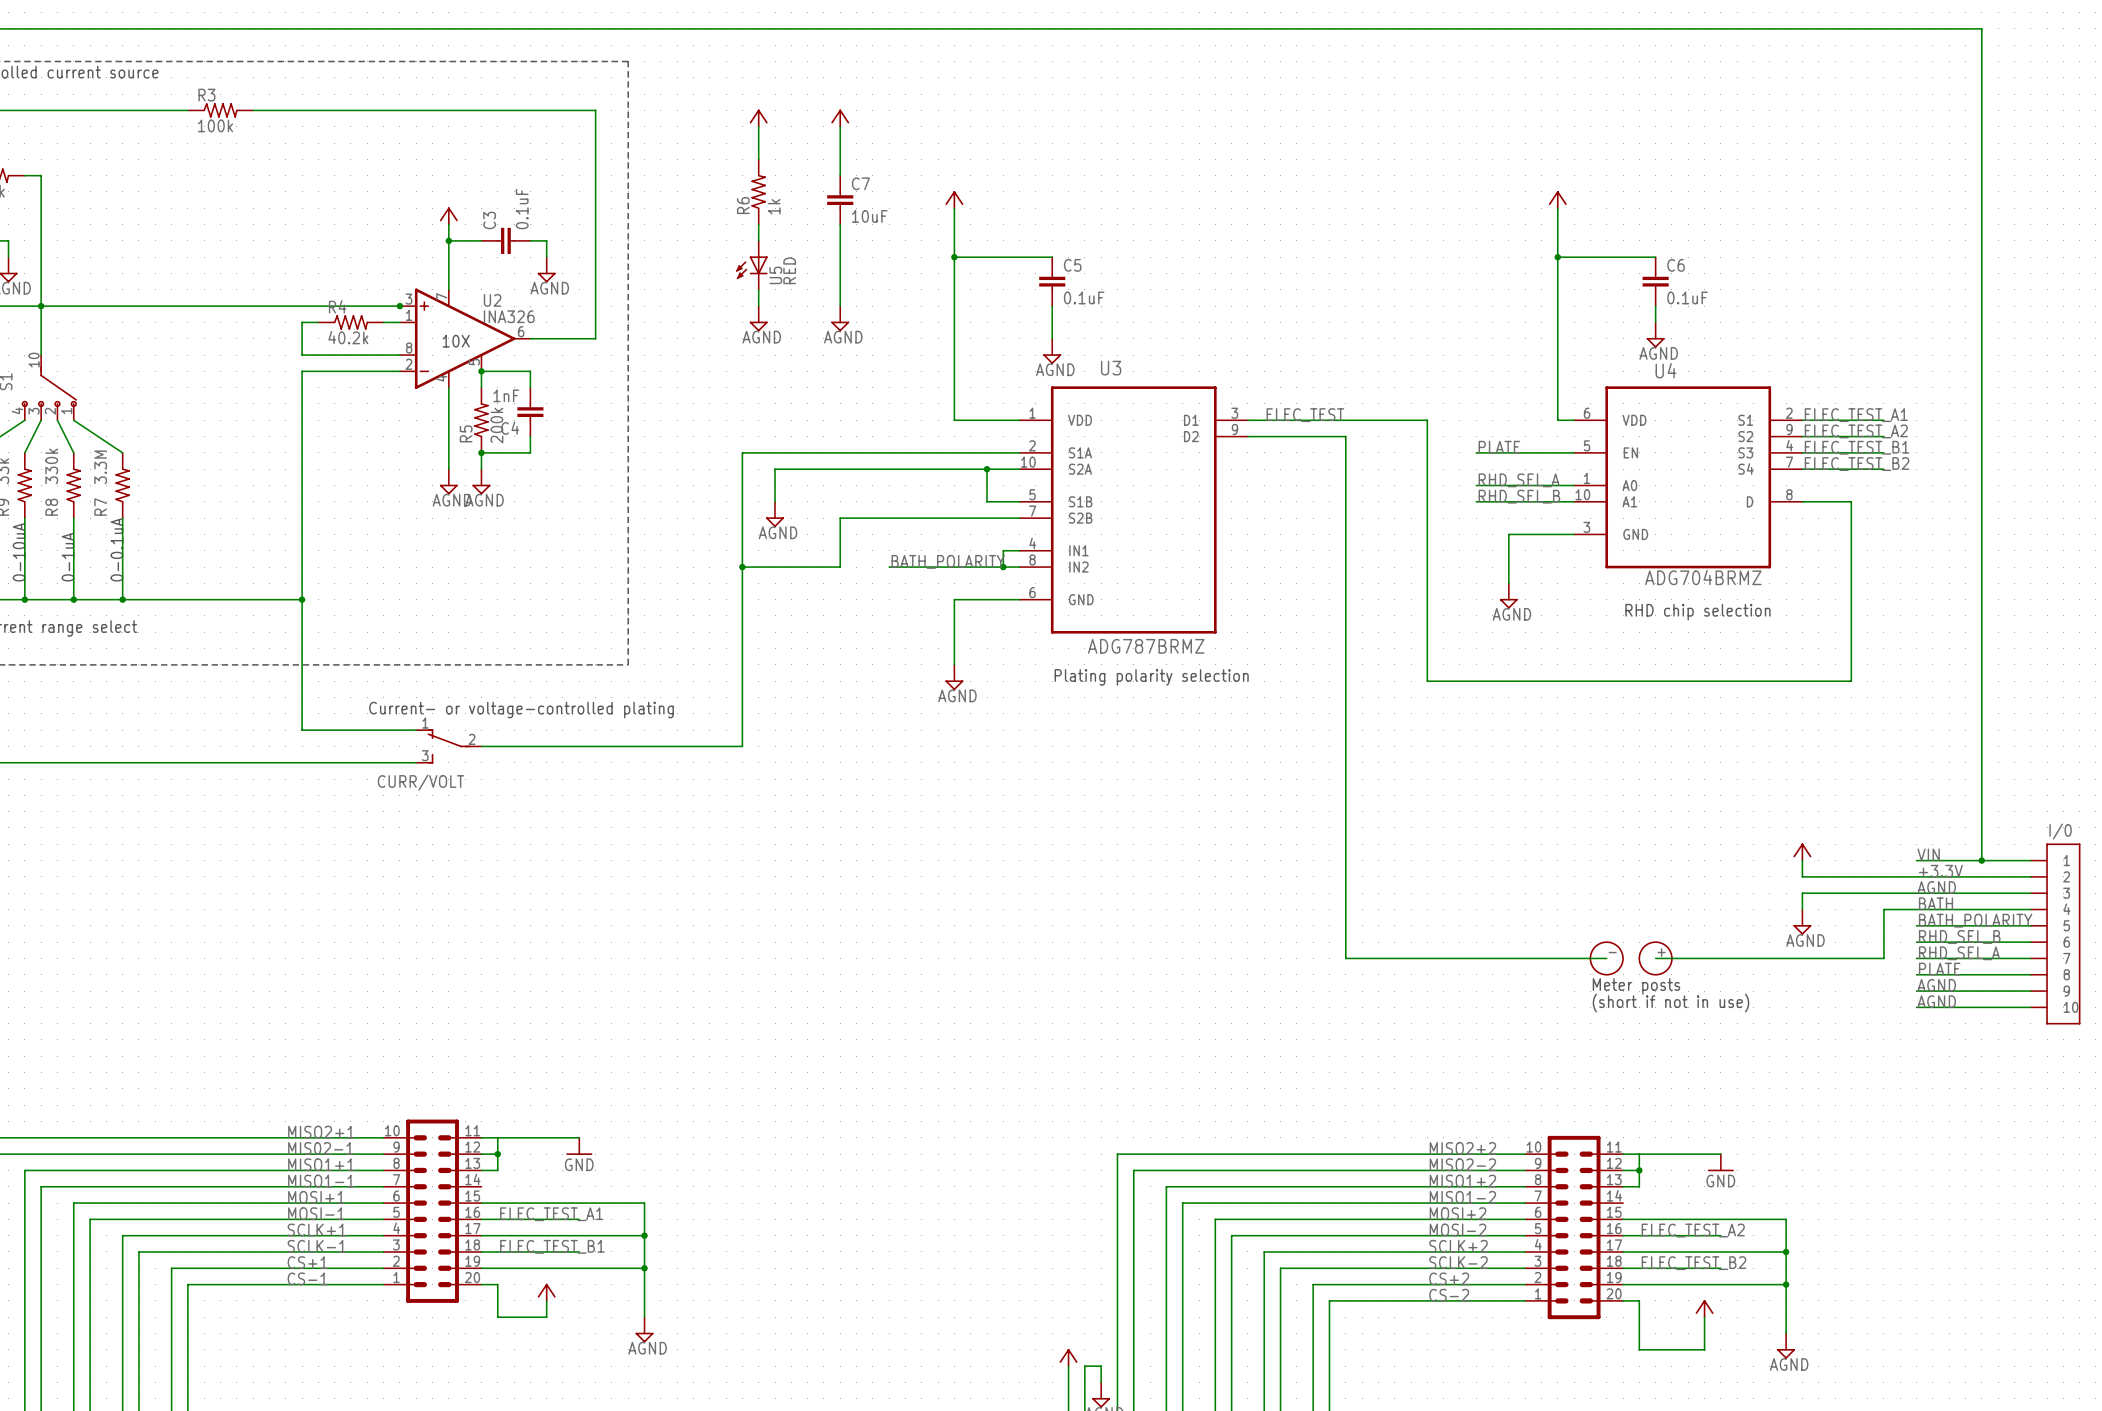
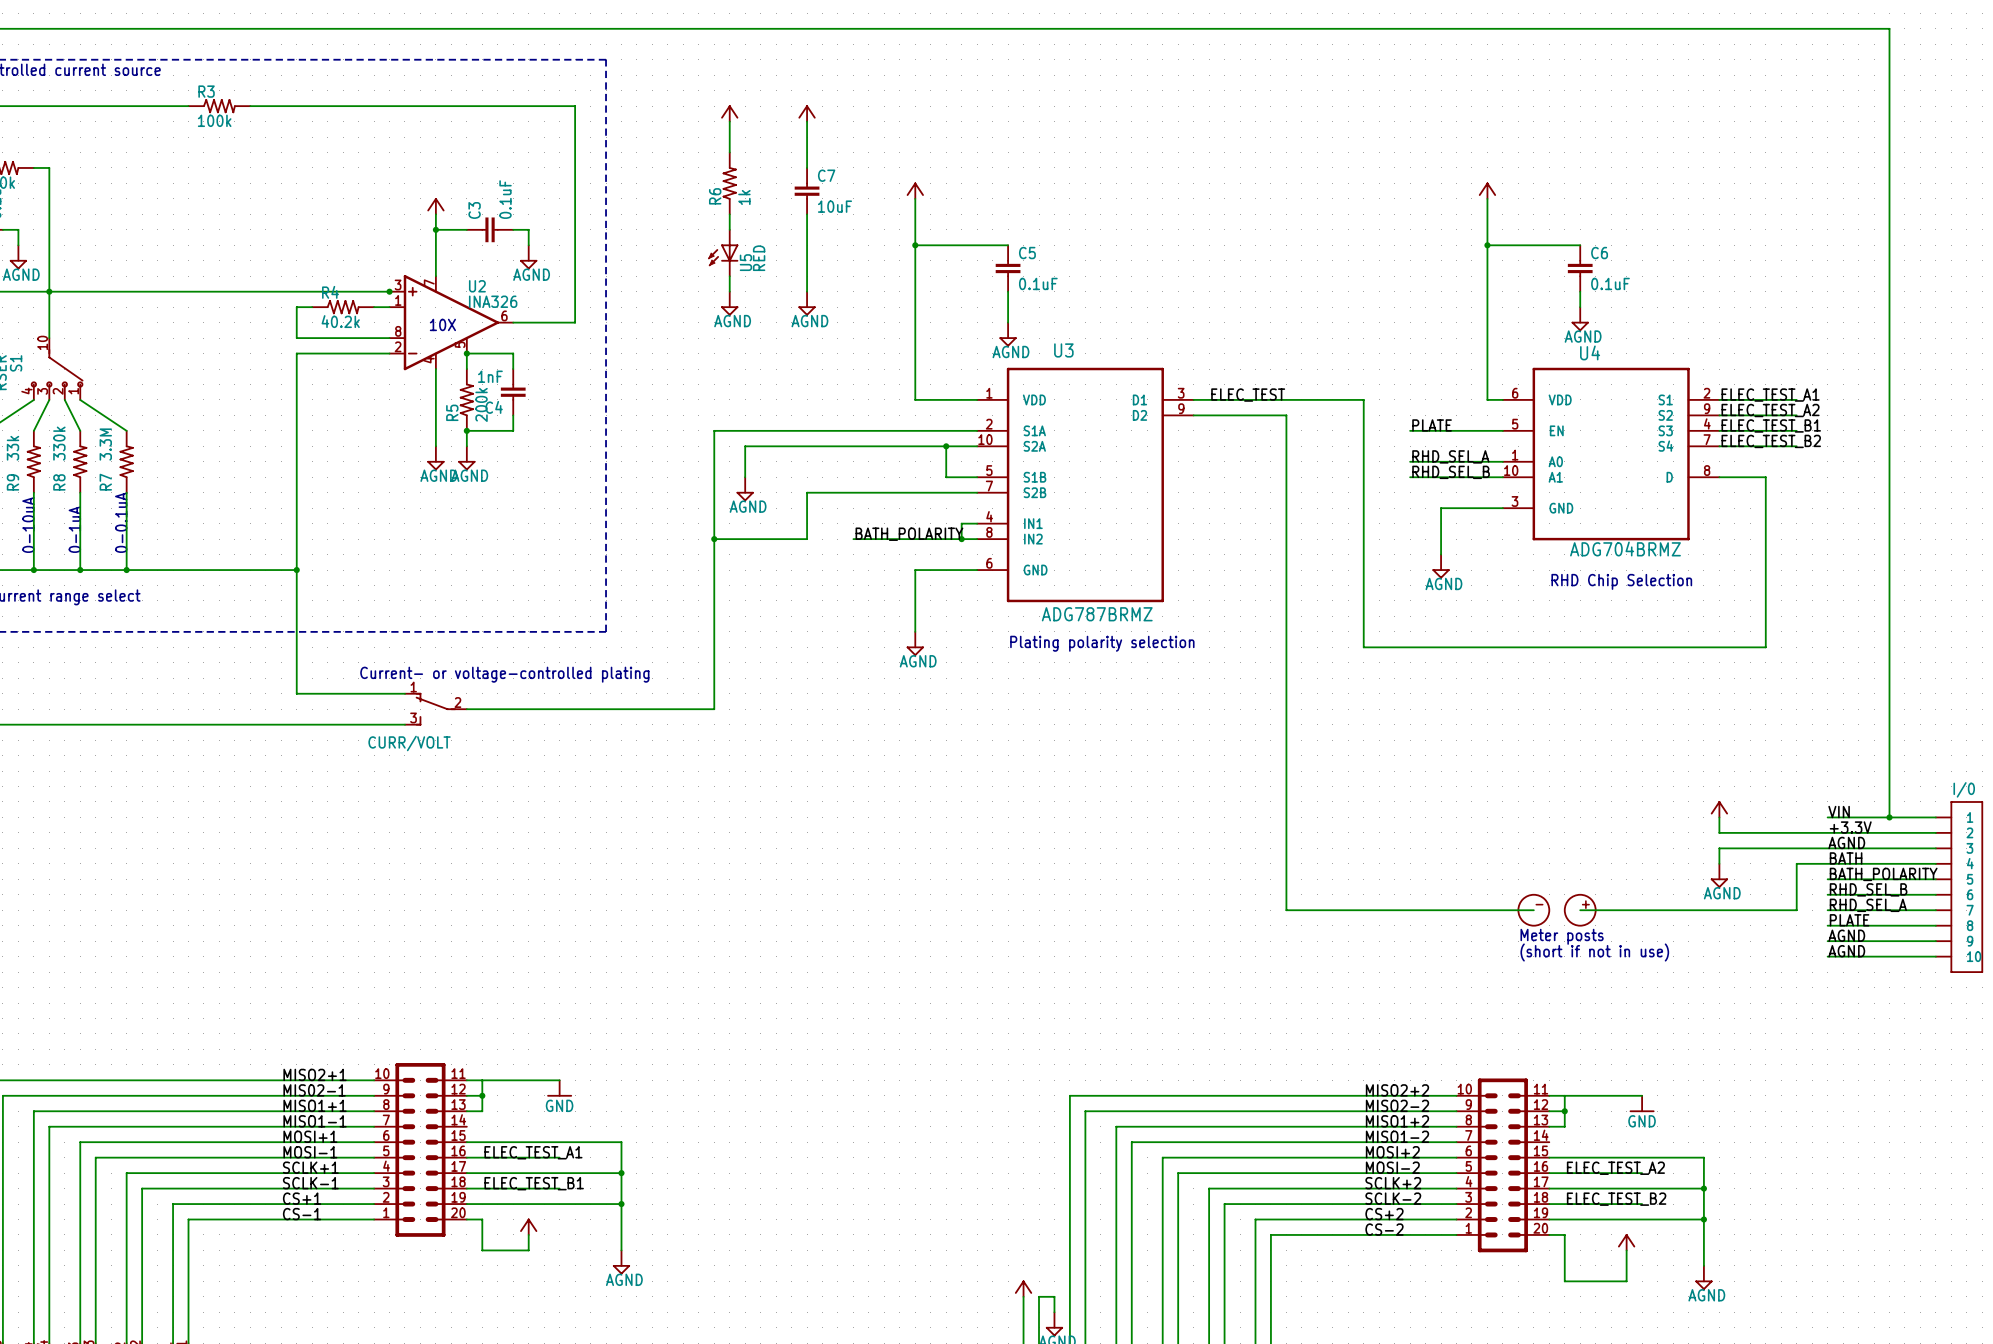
text: RHD chip selection (1697, 612) -> RHD Chip Selection (1621, 581)

